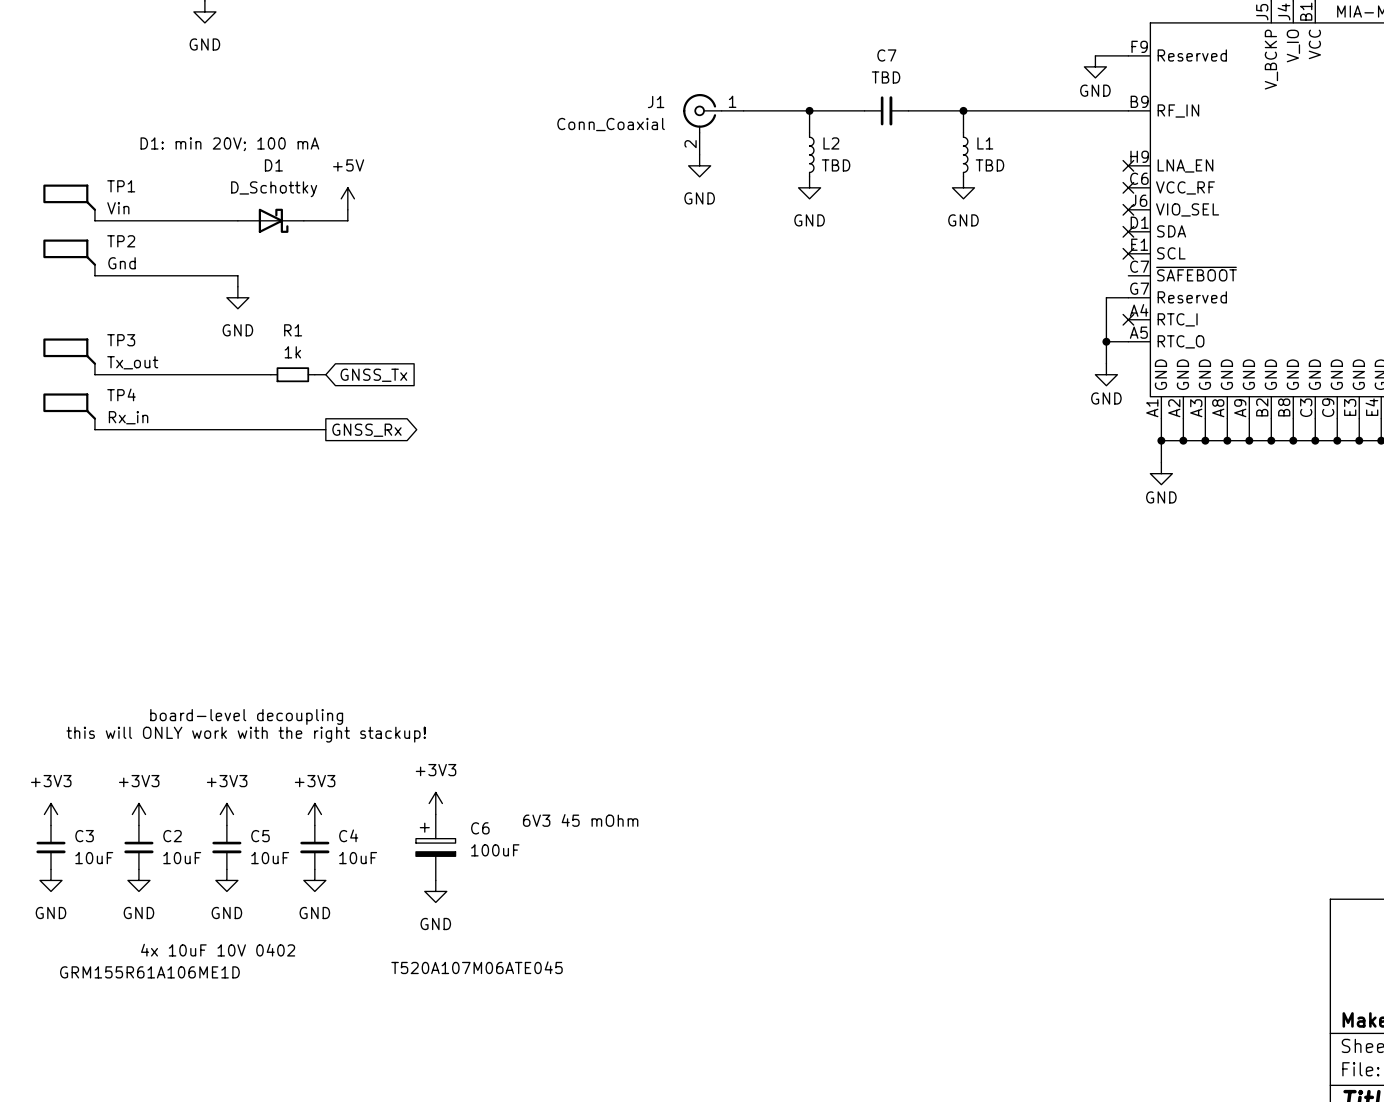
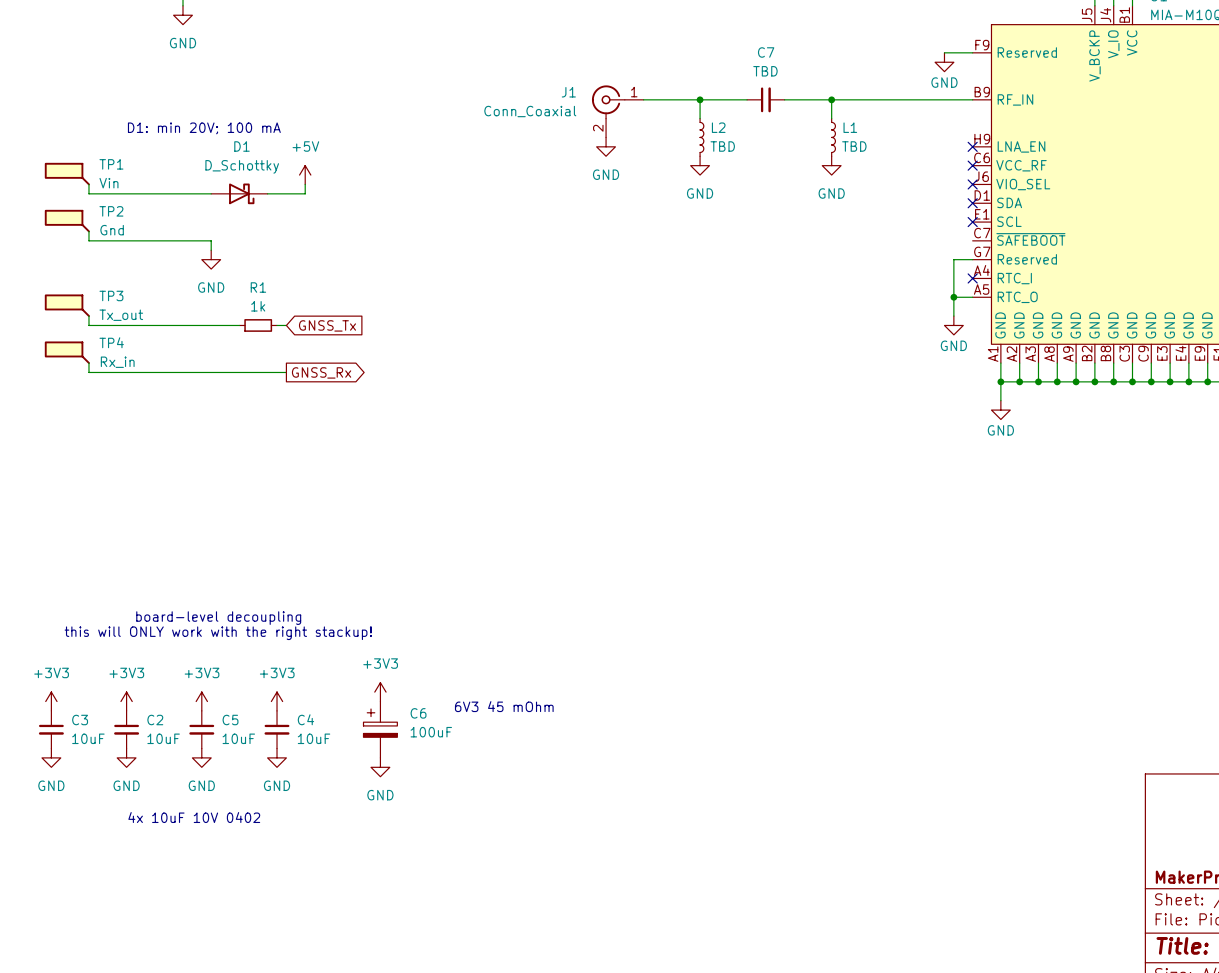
C6 text: T520A107M06ATE045 (477, 967) -> none
C3 text: GRM155R61A106ME1D (149, 972) -> none

